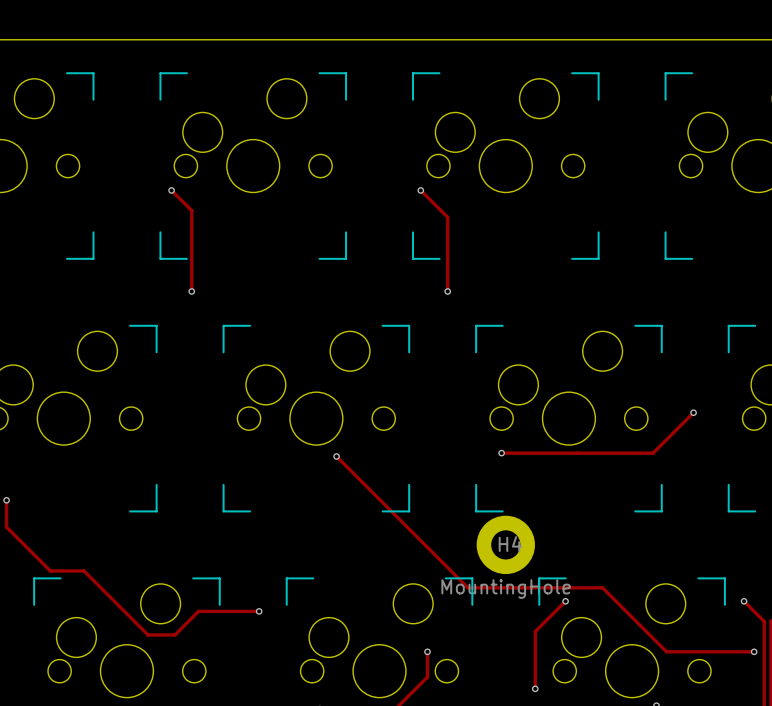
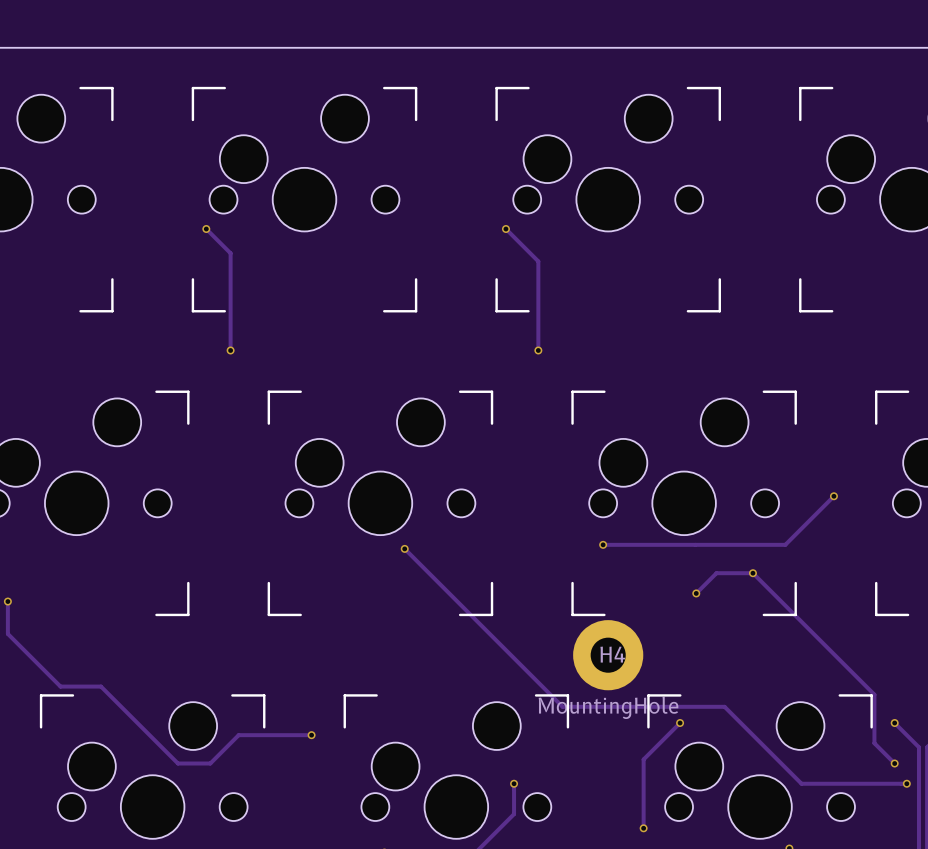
via: none -> (752, 573)
track: none -> (696, 593) (716, 573) (752, 573) (874, 694) (874, 743) (894, 763)
via: none -> (696, 593)
via: none -> (894, 763)

